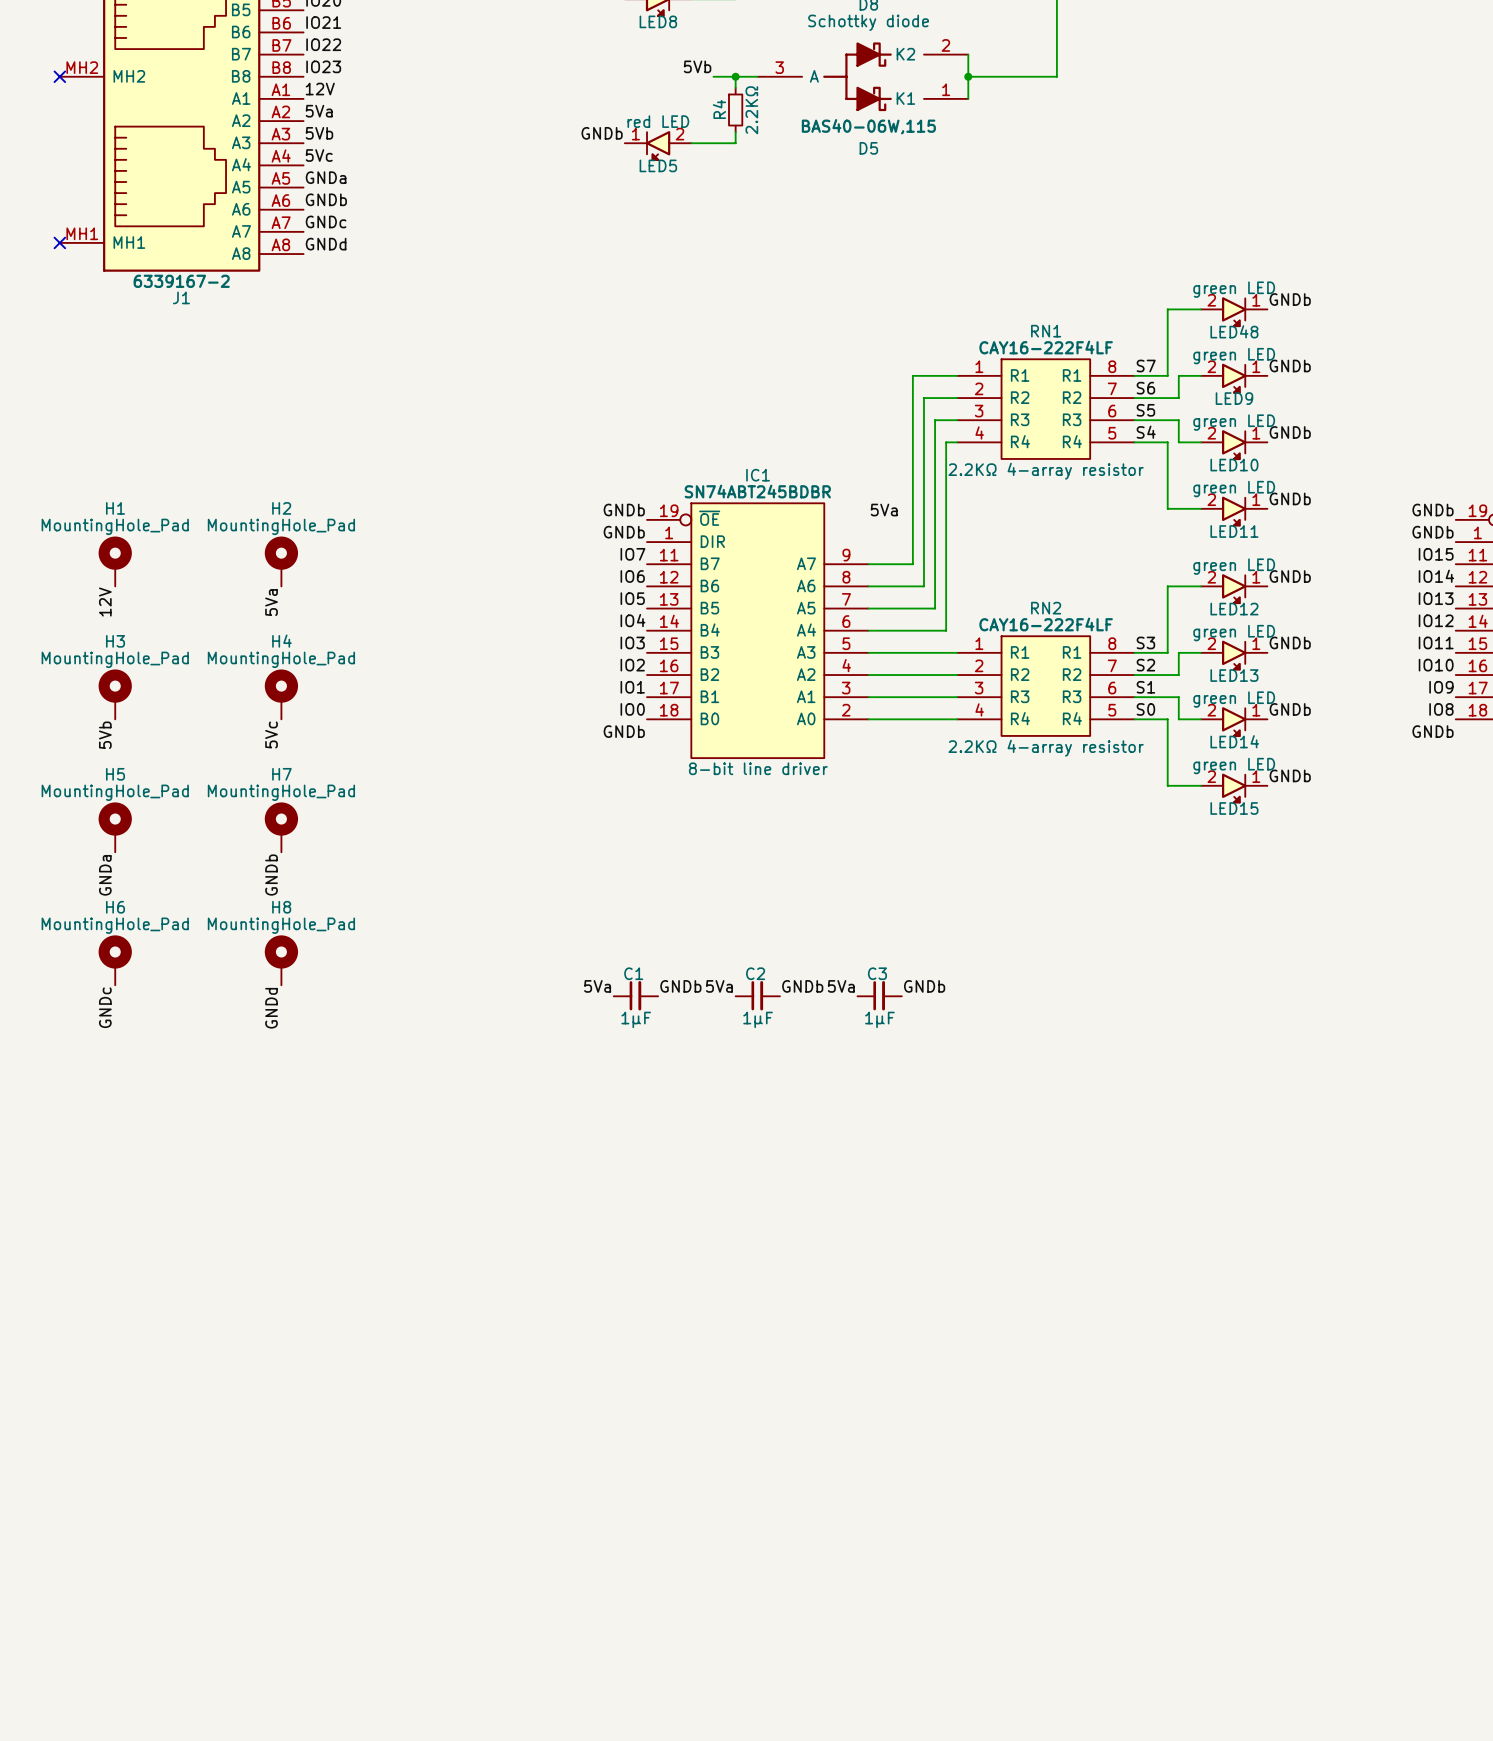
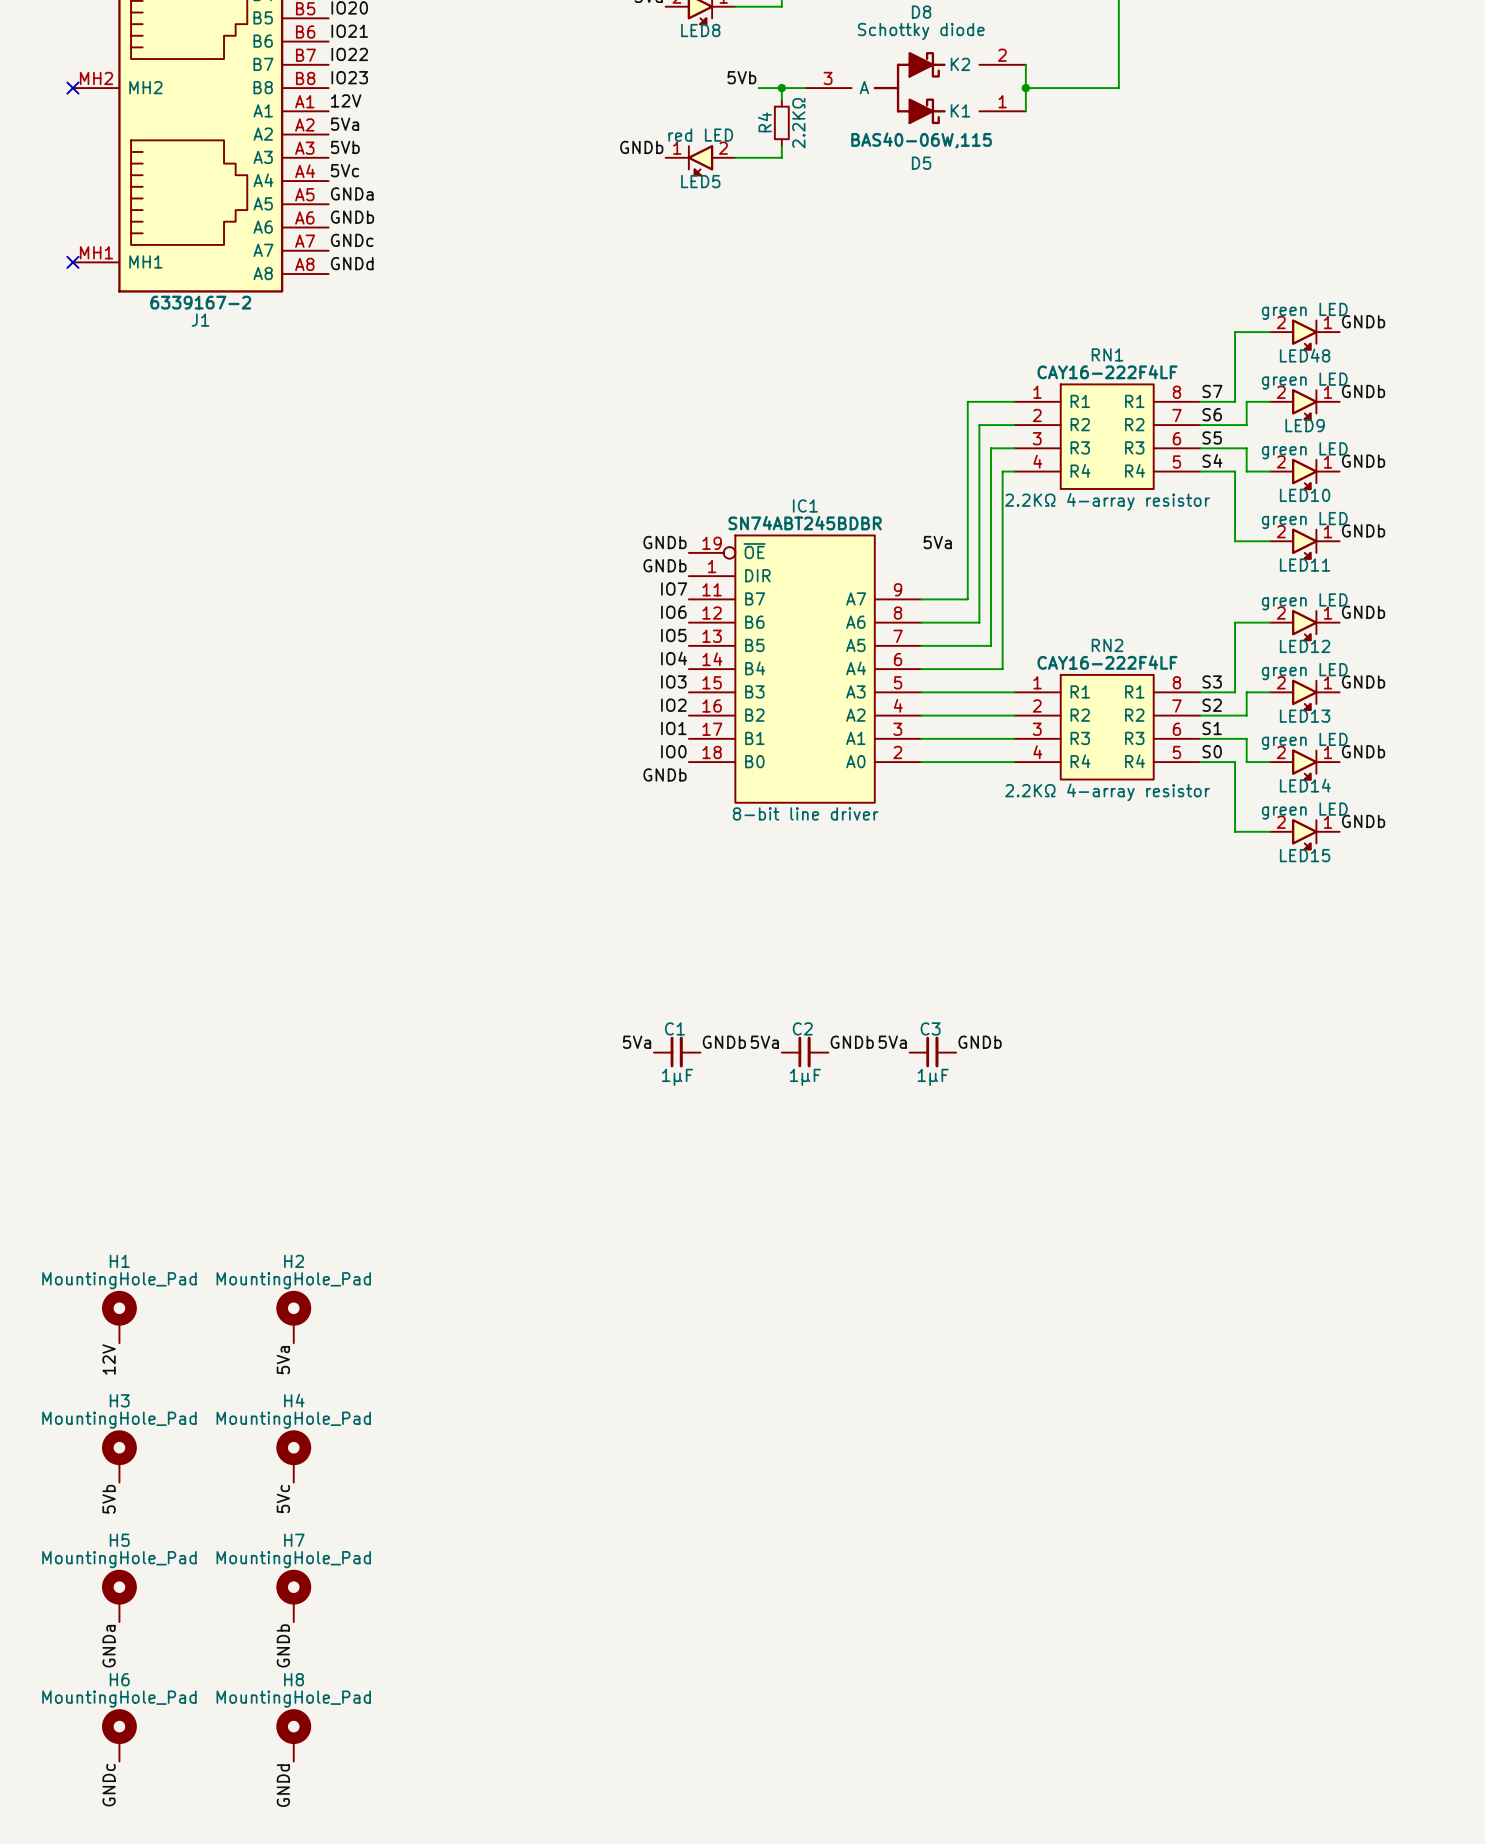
H1 position: (115, 561) -> (119, 1316)
H2 position: (281, 561) -> (293, 1316)
label: 12V (105, 602) -> none
label: 5Va (271, 602) -> none
H3 position: (115, 694) -> (119, 1456)
H4 position: (281, 694) -> (293, 1456)
label: 5Vc (271, 734) -> none
label: 5Vb (105, 735) -> none
H5 position: (115, 827) -> (119, 1595)
H7 position: (281, 827) -> (293, 1595)
label: GNDa (105, 875) -> none
label: GNDb (271, 875) -> none
H6 position: (115, 960) -> (119, 1735)
H8 position: (281, 960) -> (293, 1735)
label: GNDc (105, 1007) -> none
label: GNDd (271, 1008) -> none
label: none -> 12V (109, 1359)
label: none -> 5Va (283, 1360)
label: none -> 5Vc (283, 1498)
label: none -> 5Vb (109, 1499)
label: none -> GNDb (283, 1645)
label: none -> GNDa (109, 1646)
label: none -> GNDc (109, 1785)
label: none -> GNDd (283, 1785)

